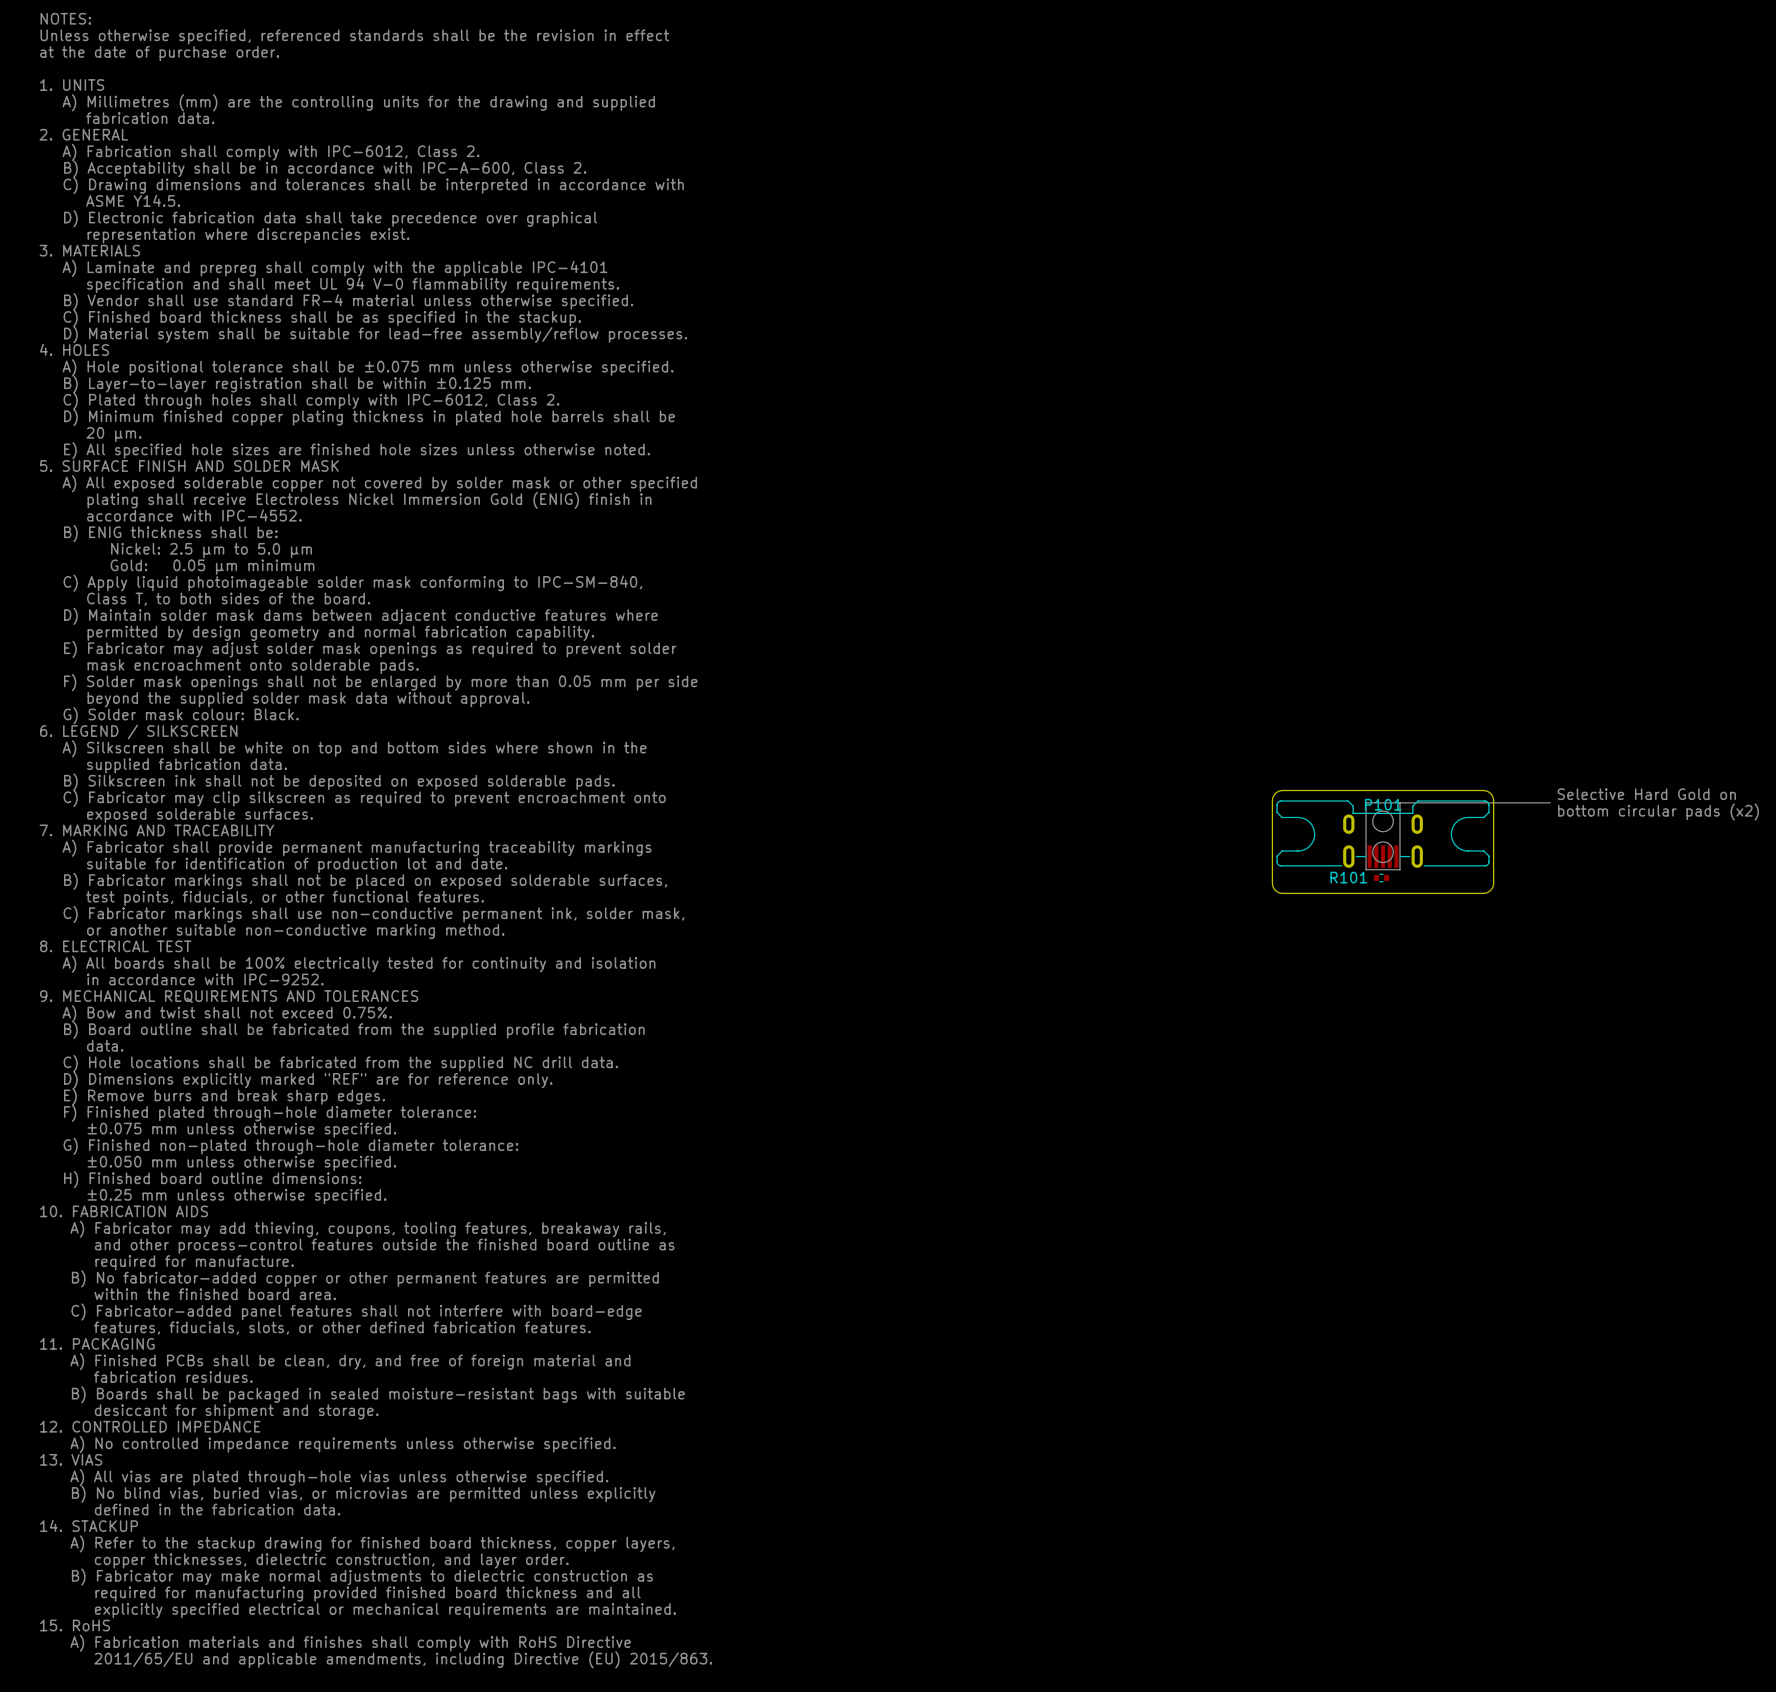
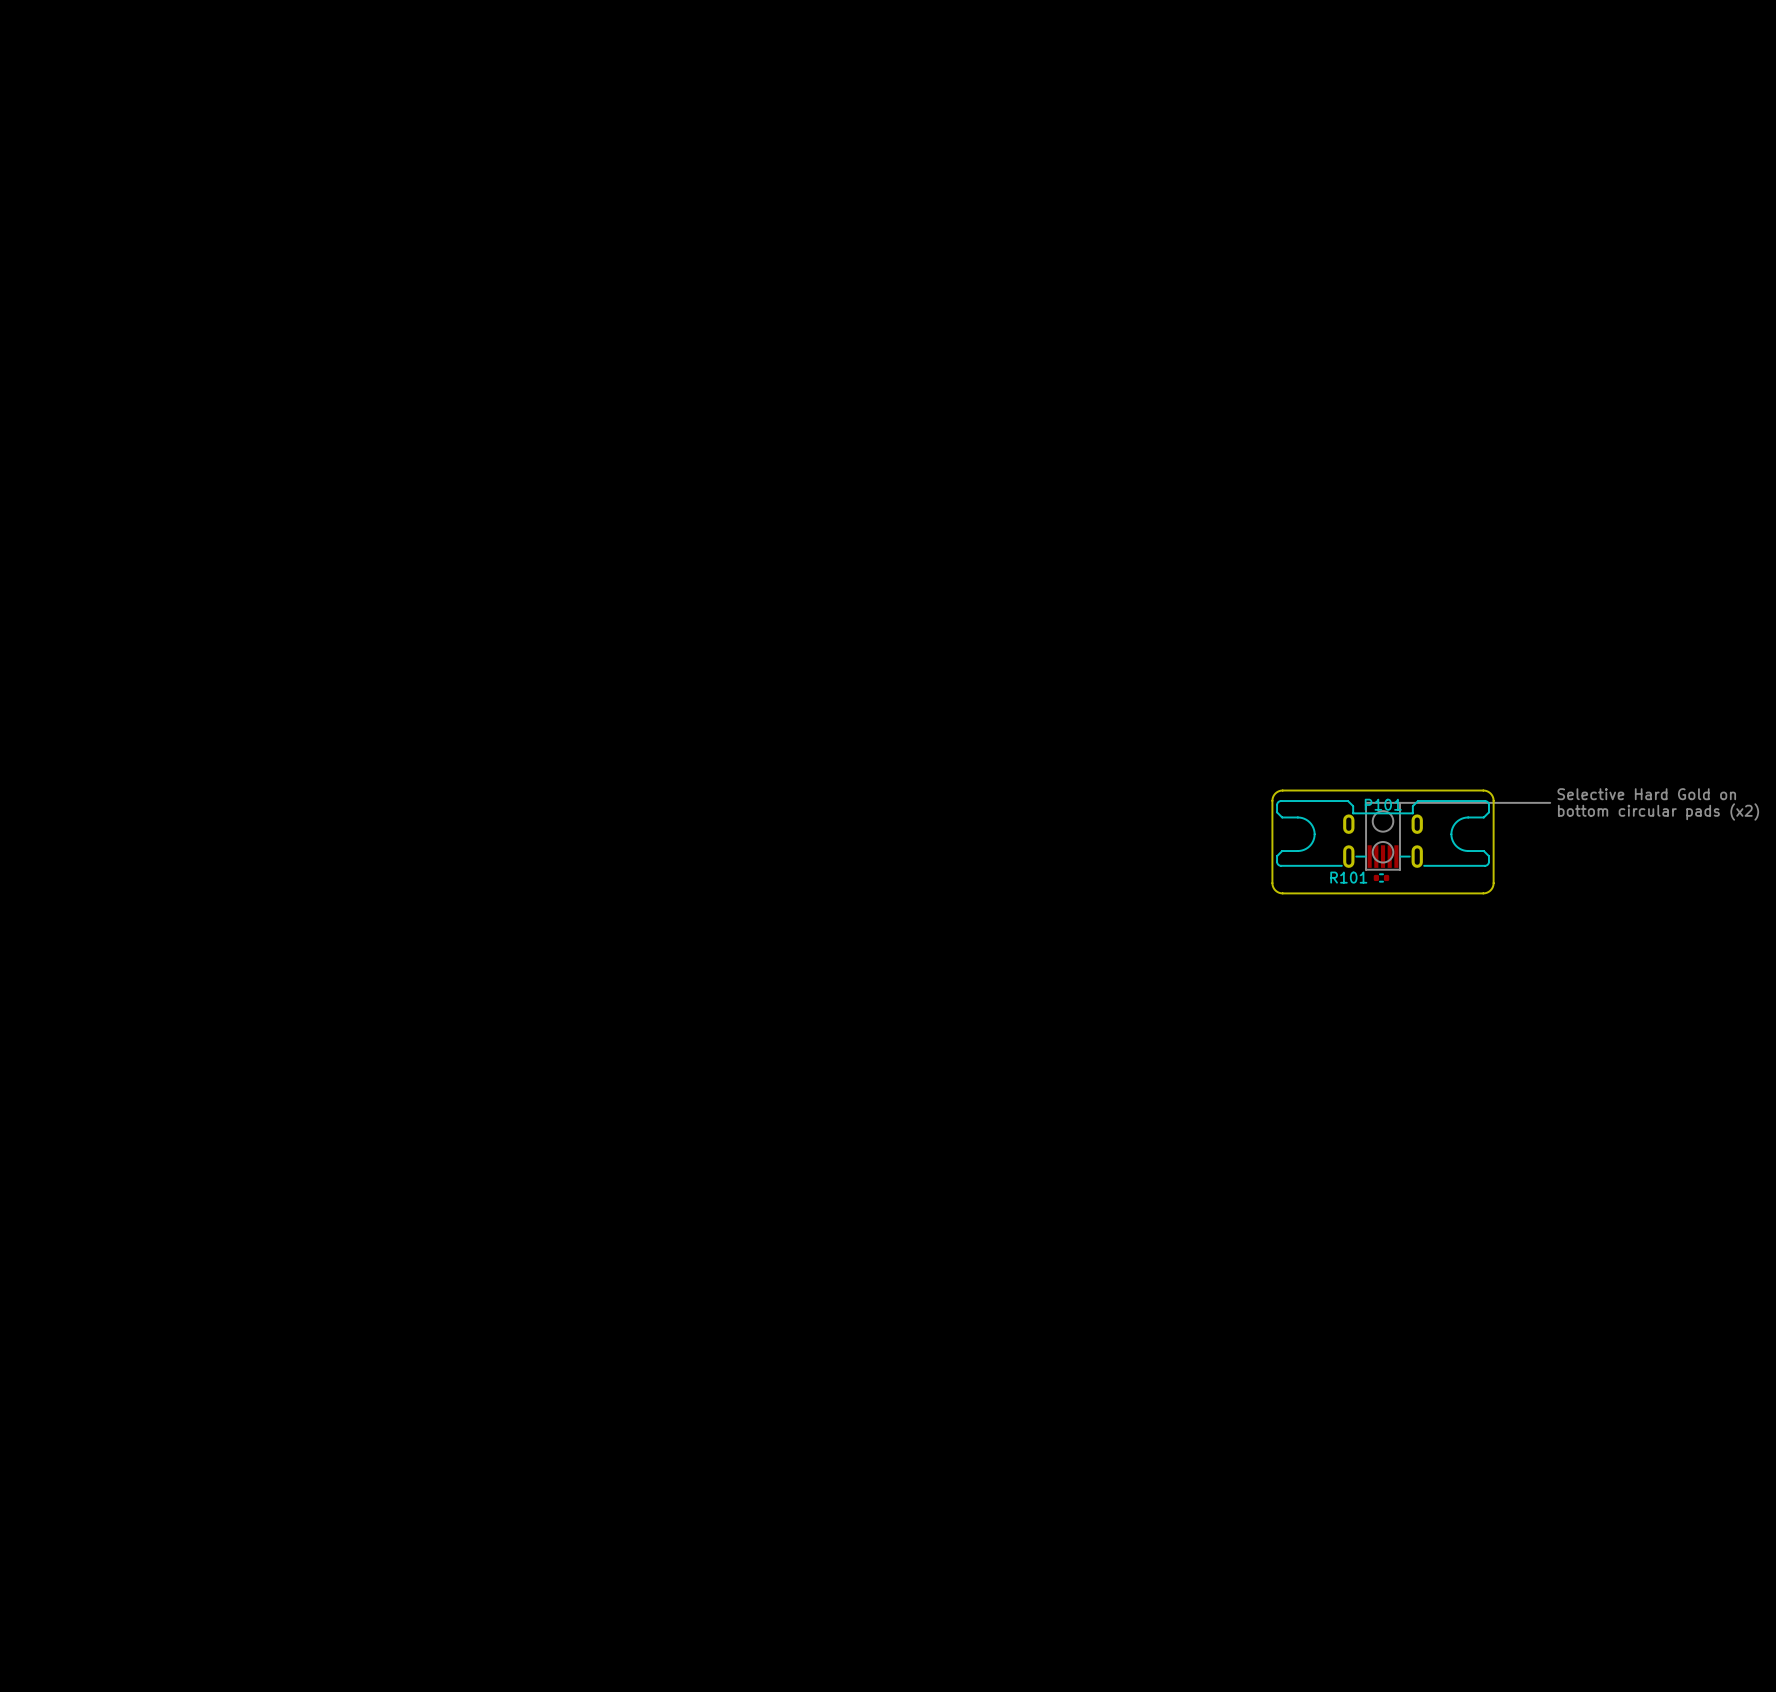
text: NOTES: (65, 18) -> none
text: Unless otherwise specified, referenced standards shall be the revision in effect (354, 37) -> none
text: at the date of purchase order. (159, 53) -> none
text: 1. UNITS (72, 85) -> none
text: A) Millimetres (mm) are the controlling units for the drawing and supplied (358, 102) -> none
text: fabrication data. (150, 118) -> none
text: 2. GENERAL (83, 134) -> none
text: A) Fabrication shall comply with IPC-6012, Class 2. (271, 152) -> none
text: B) Acceptability shall be in accordance with IPC-A-600, Class 2. (325, 169) -> none
text: C) Drawing dimensions and tolerances shall be interpreted in accordance with (373, 185) -> none
text: ASME Y14.5. (133, 200) -> none
text: D) Electronic fabrication data shall take precedence over graphical (330, 218) -> none
text: representation where discrepancies exist. (248, 235) -> none
text: 3. MATERIALS (89, 250) -> none
text: A) Laminate and prepreg shall comply with the applicable IPC-4101 (334, 268) -> none
text: specification and shall meet UL 94 V-0 flammability requirements. (353, 285) -> none
text: B) Vendor shall use standard FR-4 material unless otherwise specified. (348, 301) -> none
text: C) Finished board thickness shall be as specified in the stackup. (322, 318) -> none
text: D) Material system shall be suitable for lead-free assembly/reflow processes. (375, 334) -> none
text: 4. HOLES (74, 349) -> none
text: A) Hole positional tolerance shall be ±0.075 mm unless otherwise specified. (368, 367) -> none
text: B) Layer-to-layer registration shall be within ±0.125 mm. (297, 384) -> none
text: C) Plated through holes shall comply with IPC-6012, Class 2. (311, 400) -> none
text: D) Minimum finished copper plating thickness in plated hole barrels shall be (369, 417) -> none
text: 20 µm. (114, 434) -> none
text: E) All specified hole sizes are finished hole sizes unless otherwise noted. (357, 450) -> none
text: 5. SURFACE FINISH AND SOLDER MASK (189, 465) -> none
text: A) All exposed solderable copper not covered by solder mask or other specified (379, 483) -> none
text: plating shall receive Electroless Nickel Immersion Gold (ENIG) finish in (369, 500) -> none
text: accordance with IPC-4552. (194, 515) -> none
text: B) ENIG thickness shall be: (170, 533) -> none
text: Nickel: 2.5 µm to 5.0 µm (211, 550) -> none
text: Gold: 0.05 µm minimum (212, 567) -> none
text: C) Apply liquid photoimageable solder mask conforming to IPC-SM-840, (352, 583) -> none
text: Class T, to both sides of the board. (228, 599) -> none
text: D) Maintain solder mask dams between adjacent conductive features where (360, 616) -> none
text: permitted by design geometry and normal fabrication capability. (340, 633) -> none
text: E) Fabricator may adjust solder mask openings as required to prevent solder (370, 649) -> none
text: mask encroachment onto solderable pads. (253, 666) -> none
text: F) Solder mask openings shall not be enlarged by more than 0.05 mm per side (380, 682) -> none
text: beyond the supplied solder mask data without approval. (308, 699) -> none
text: G) Solder mask colour: Black. (181, 715) -> none
text: 6. LEGEND / SILKSCREEN (138, 732) -> none
text: A) Silkscreen shall be white on top and bottom sides where shown in the (354, 748) -> none
text: supplied fabrication data. (187, 765) -> none
text: B) Silkscreen ink shall not be deposited on exposed solderable pads. (339, 781) -> none
text: C) Fabricator may clip silkscreen as required to prevent encroachment onto (364, 798) -> none
text: exposed solderable surfaces. (200, 815) -> none
text: 7. MARKING AND TRACEABILITY (156, 830) -> none
text: A) Fabricator shall provide permanent manufacturing traceability markings (357, 848) -> none
text: suitable for identification of production lot and date. (297, 865) -> none
text: B) Fabricator markings shall not be placed on exposed solderable surfaces, (365, 881) -> none
text: test points, fiducials, or other functional features. (285, 898) -> none
text: C) Fabricator markings shall use non-conductive permanent ink, solder mask, (373, 914) -> none
text: or another suitable non-conductive marking method. (295, 931) -> none
text: 8. ELECTRICAL TEST (115, 946) -> none
text: A) All boards shall be 100% electrically tested for continuity and isolation (358, 964) -> none
text: in accordance with IPC-9252. (205, 979) -> none
text: 9. MECHANICAL REQUIREMENTS AND TOLERANCES (229, 996) -> none
text: A) Bow and twist shall not exceed 0.75%. (227, 1013) -> none
text: B) Board outline shall be fabricated from the supplied profile fabrication (354, 1030) -> none
text: data. (105, 1045) -> none
text: C) Hole locations shall be fabricated from the supplied NC drill data. (340, 1063) -> none
text: D) Dimensions explicitly marked "REF" are for reference only. (308, 1080) -> none
text: E) Remove burrs and break sharp edges. (224, 1096) -> none
text: F) Finished plated through-hole diameter tolerance: (270, 1113) -> none
text: ±0.075 mm unless otherwise specified. (241, 1130) -> none
text: G) Finished non-plated through-hole diameter tolerance: (290, 1146) -> none
text: ±0.050 mm unless otherwise specified. (241, 1163) -> none
text: H) Finished board outline dimensions: (212, 1179) -> none
text: ±0.25 mm unless otherwise specified. (236, 1196) -> none
text: 10. FABRICATION AIDS (124, 1211) -> none
text: A) Fabricator may add thieving, coupons, tooling features, breakaway rails, (368, 1229) -> none
text: and other process-control features outside the finished board outline as (384, 1246) -> none
text: required for manufacture. (194, 1262) -> none
text: B) No fabricator-added copper or other permanent features are permitted (365, 1278) -> none
text: within the finished board area. (215, 1294) -> none
text: C) Fabricator-added panel features shall not interfere with board-edge (356, 1312) -> none
text: features, fiducials, slots, or other defined fabrication features. (342, 1328) -> none
text: 11. PACKAGING (97, 1343) -> none
text: A) Finished PCBs shall be clean, dry, and free of foreign material and (350, 1361) -> none
text: fabrication residues. (173, 1377) -> none
text: B) Boards shall be packaged in sealed moisture-resistant bags with suitable (378, 1394) -> none
text: desiccant for shipment and storage. (236, 1411) -> none
text: 12. CONTROLLED IMPEDANCE (150, 1426) -> none
text: A) No controlled impedance requirements unless otherwise specified. (343, 1444) -> none
text: 13. VIAS (71, 1459) -> none
text: A) All vias are plated through-hole vias unless otherwise specified. (339, 1477) -> none
text: B) No blind vias, buried vias, or microvias are permitted unless explicitly (363, 1494) -> none
text: defined in the fabrication data. (217, 1509) -> none
text: 14. STACKUP (89, 1525) -> none
text: A) Refer to the stackup drawing for finished board thickness, copper layers, (372, 1543) -> none
text: copper thicknesses, dielectric construction, and layer order. (331, 1560) -> none
text: B) Fabricator may make normal adjustments to dielectric construction as (362, 1577) -> none
text: required for manufacturing provided finished board thickness and all (368, 1594) -> none
text: explicitly specified electrical or mechanical requirements are maintained. (385, 1610) -> none
text: 15. RoHS (75, 1625) -> none
text: A) Fabrication materials and finishes shall comply with RoHS Directive (350, 1643) -> none
text: 2011/65/EU and applicable amendments, including Directive (EU) 2015/863. (403, 1659) -> none

